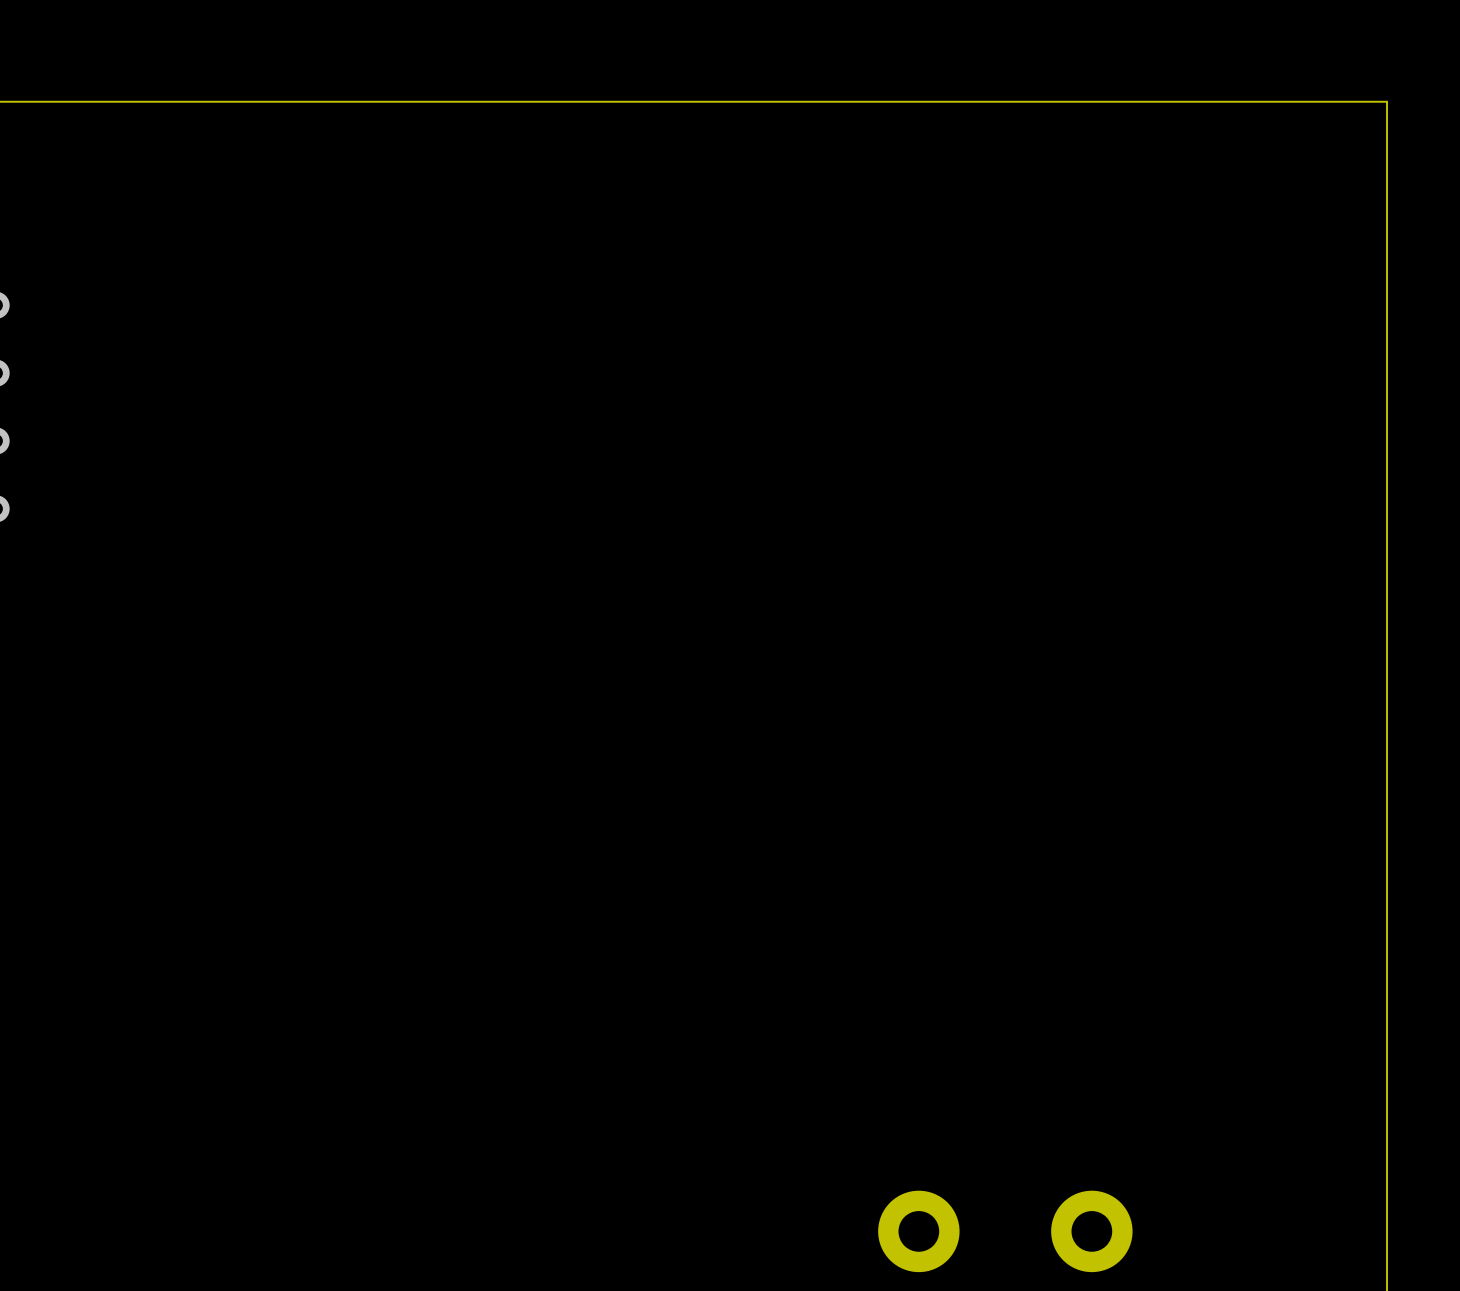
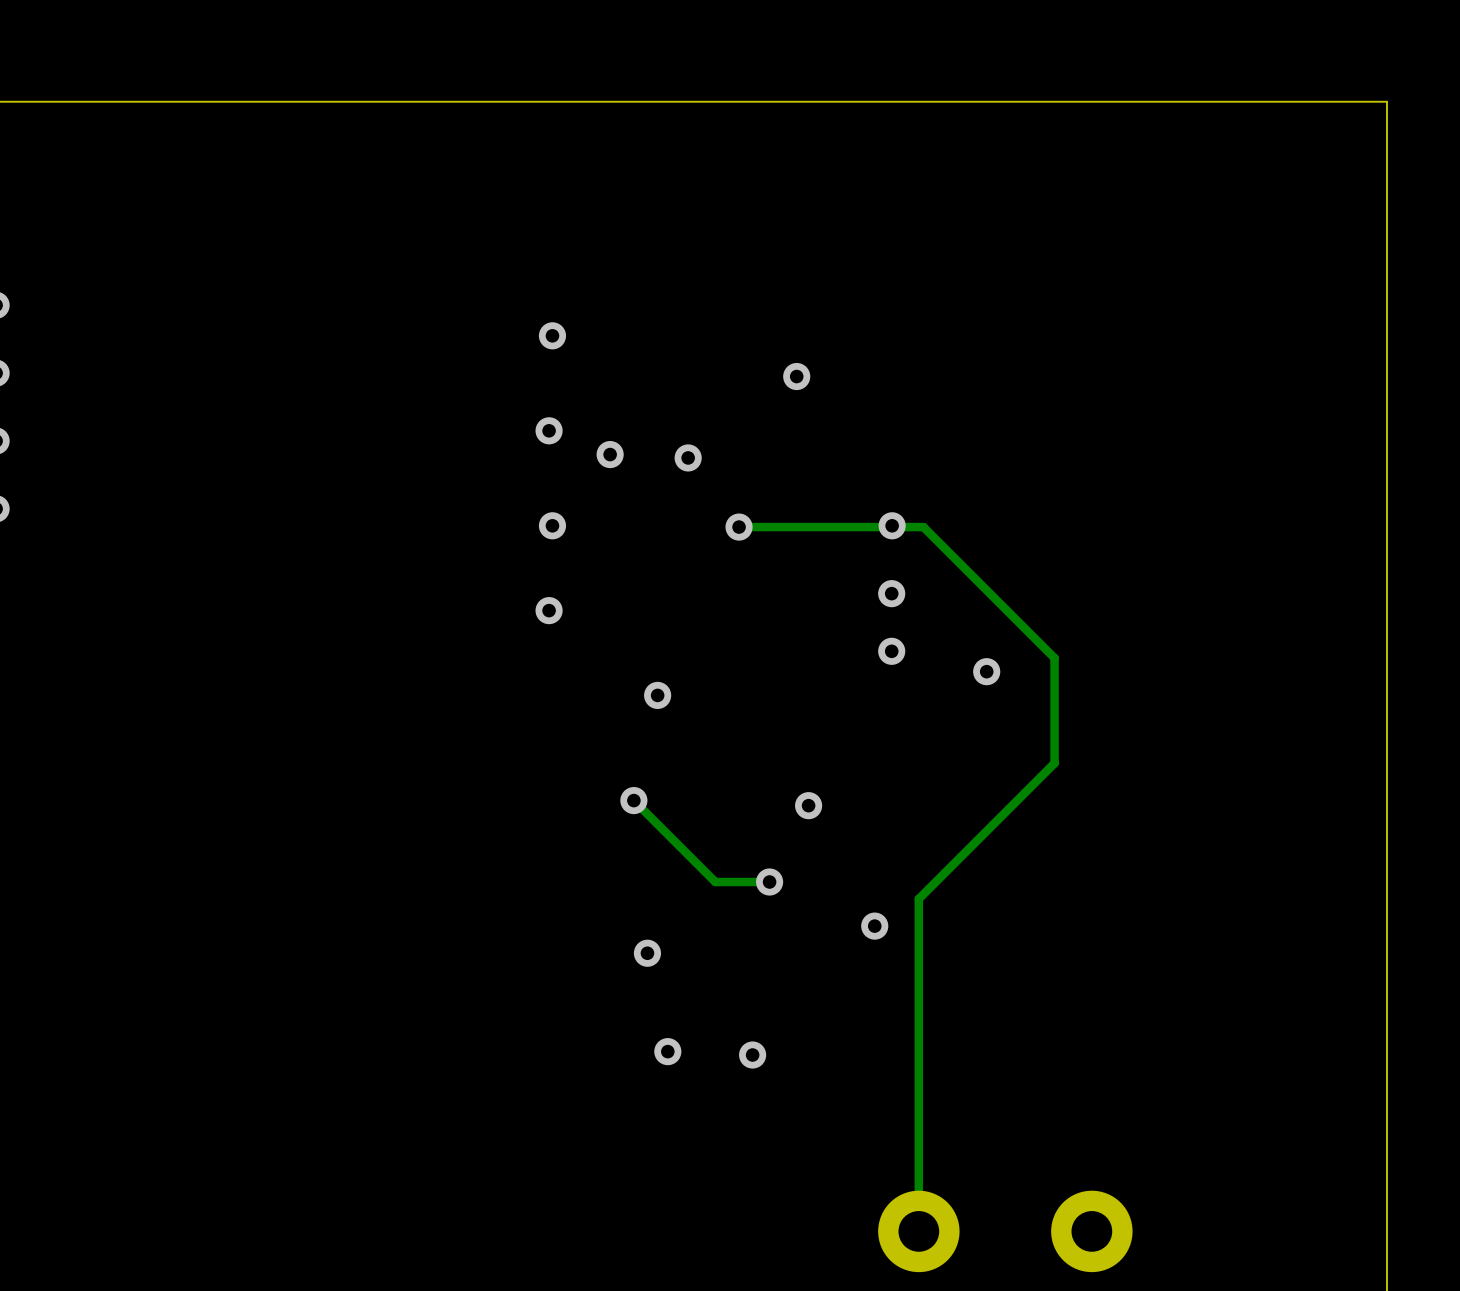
via: none -> (552, 335)
via: none -> (796, 376)
via: none -> (549, 430)
via: none -> (610, 454)
via: none -> (688, 457)
via: none -> (552, 525)
via: none -> (892, 525)
track: none -> (739, 527) (923, 527) (1054, 658) (1054, 763) (918, 898) (918, 1231)
via: none -> (739, 527)
via: none -> (891, 593)
via: none -> (549, 610)
via: none -> (891, 651)
via: none -> (986, 671)
via: none -> (657, 695)
track: none -> (633, 800) (715, 882) (769, 882)
via: none -> (633, 800)
via: none -> (808, 805)
via: none -> (769, 882)
via: none -> (874, 926)
via: none -> (647, 953)
via: none -> (667, 1051)
via: none -> (752, 1055)

